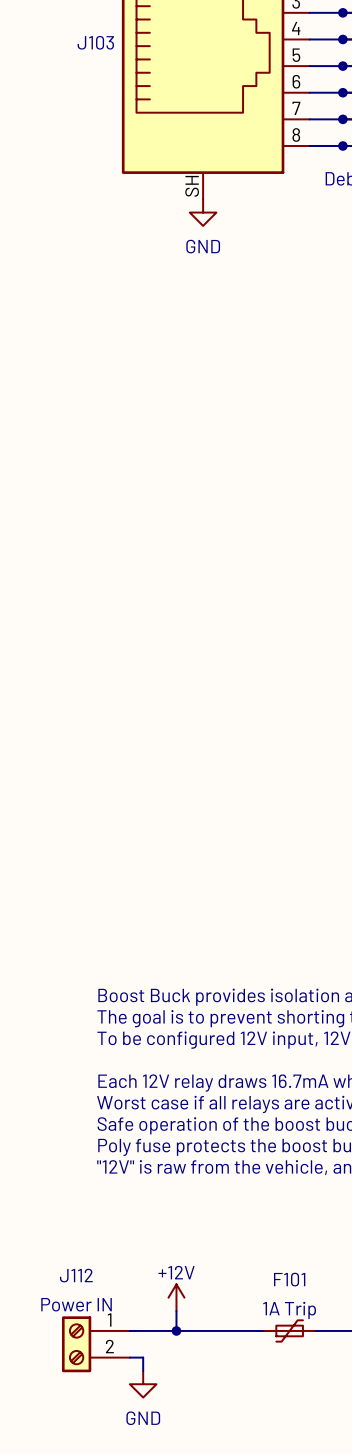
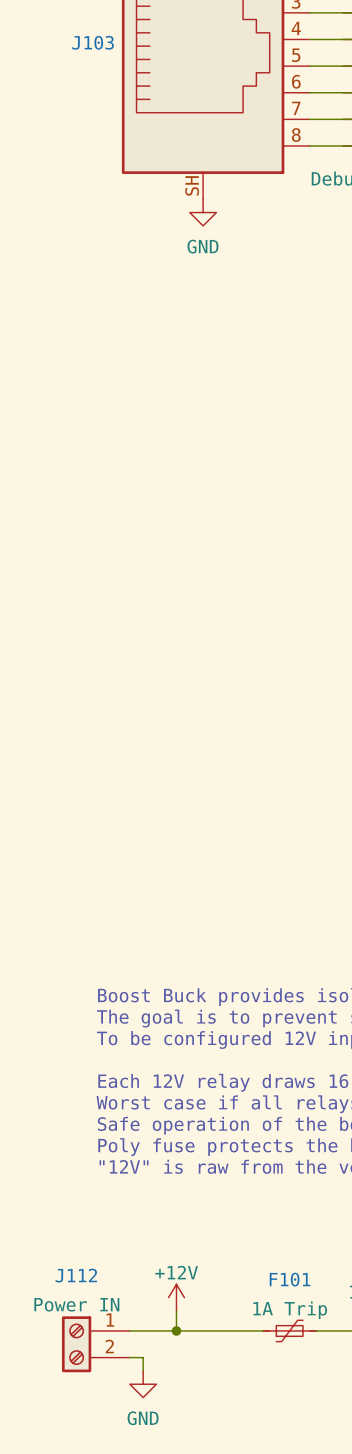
junction: (342, 12) -> none
junction: (342, 39) -> none
junction: (342, 66) -> none
junction: (342, 92) -> none
junction: (342, 119) -> none
junction: (342, 145) -> none

